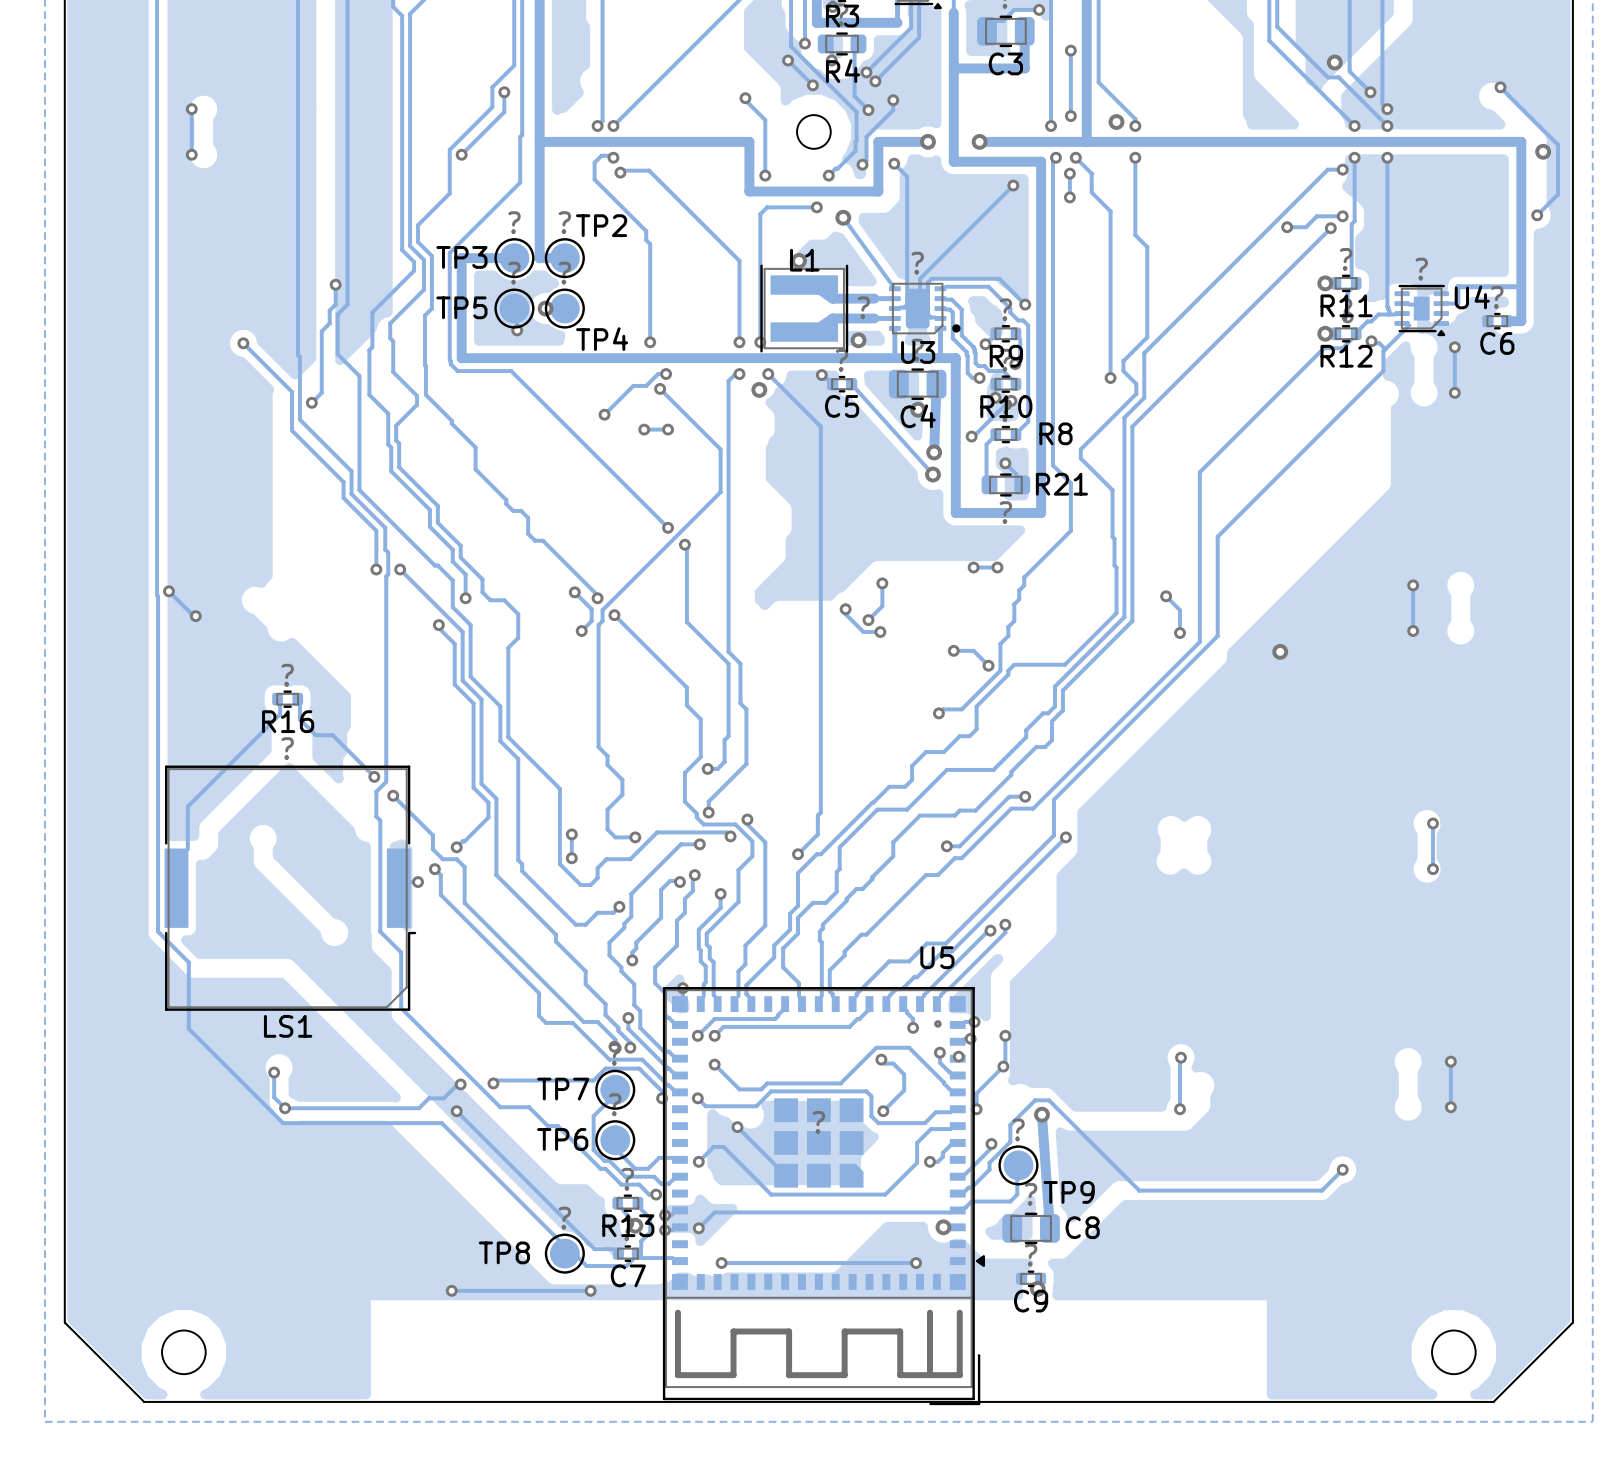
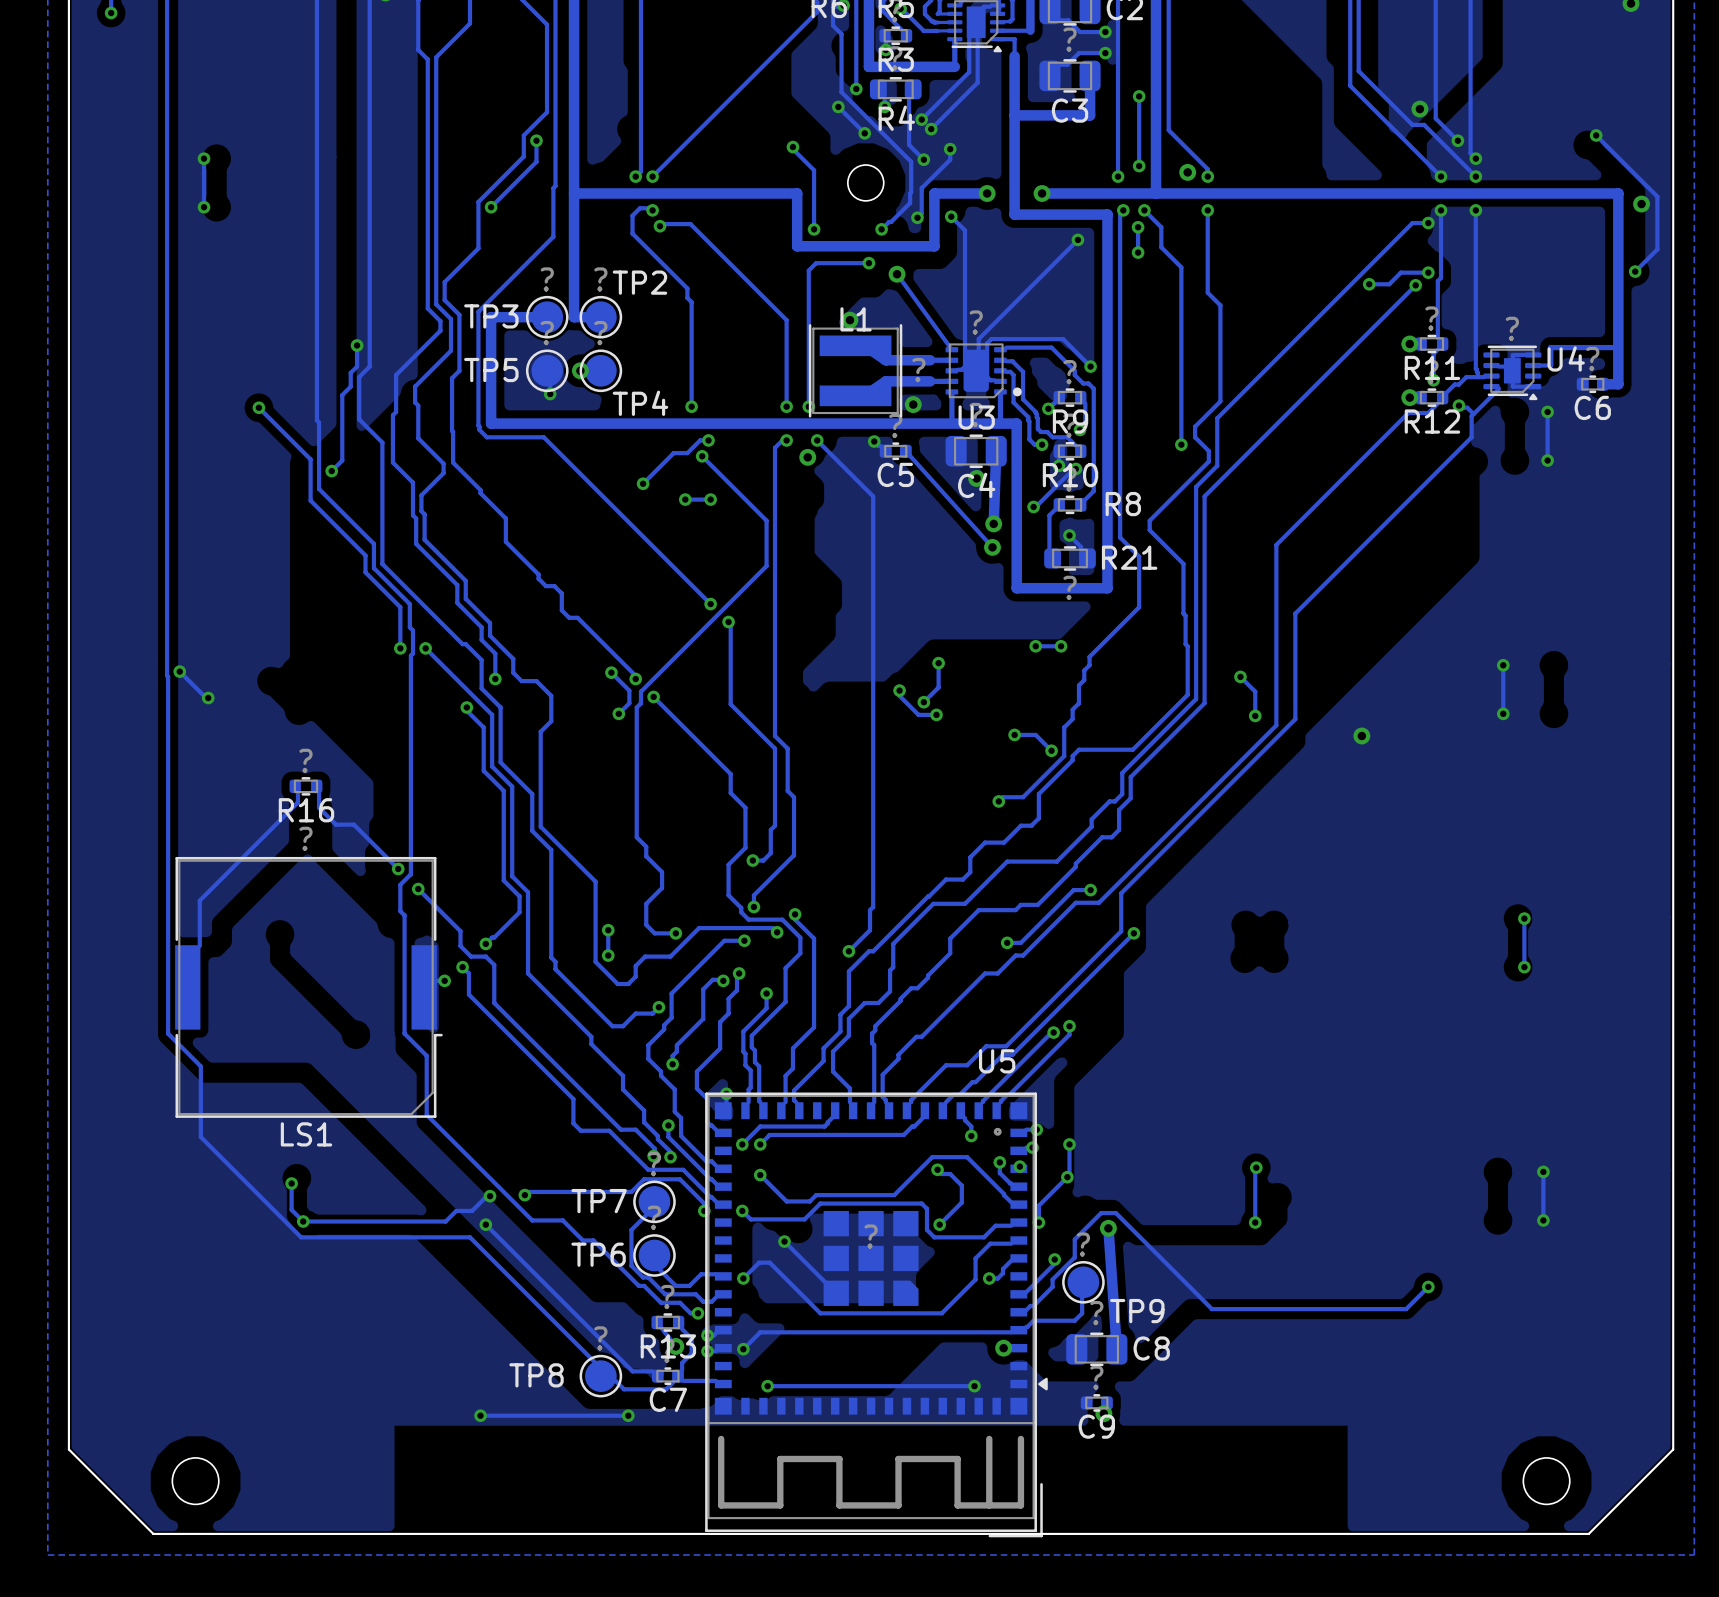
track: none -> (1529, 354) (1512, 354) (1512, 362)
track: none -> (1512, 379) (1512, 386) (1529, 386)

